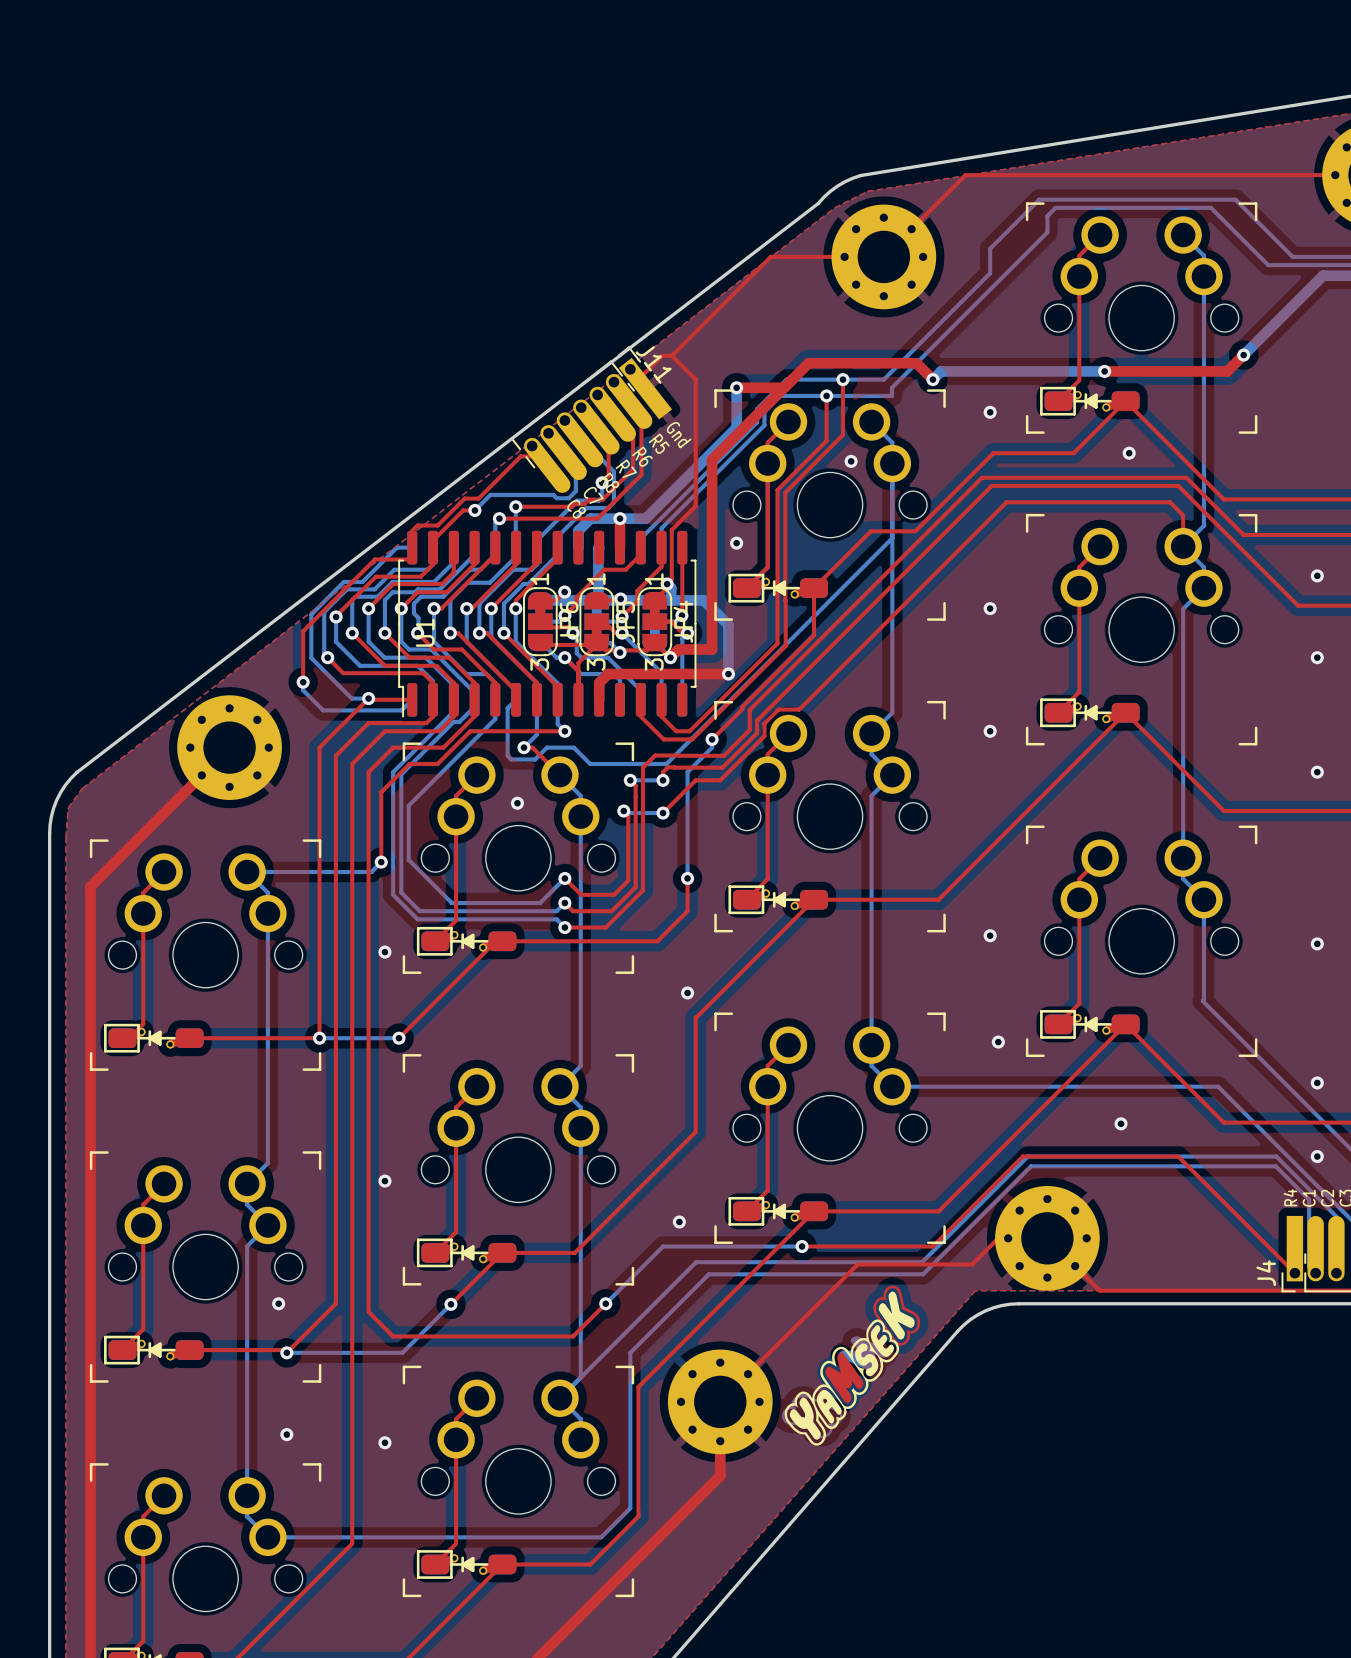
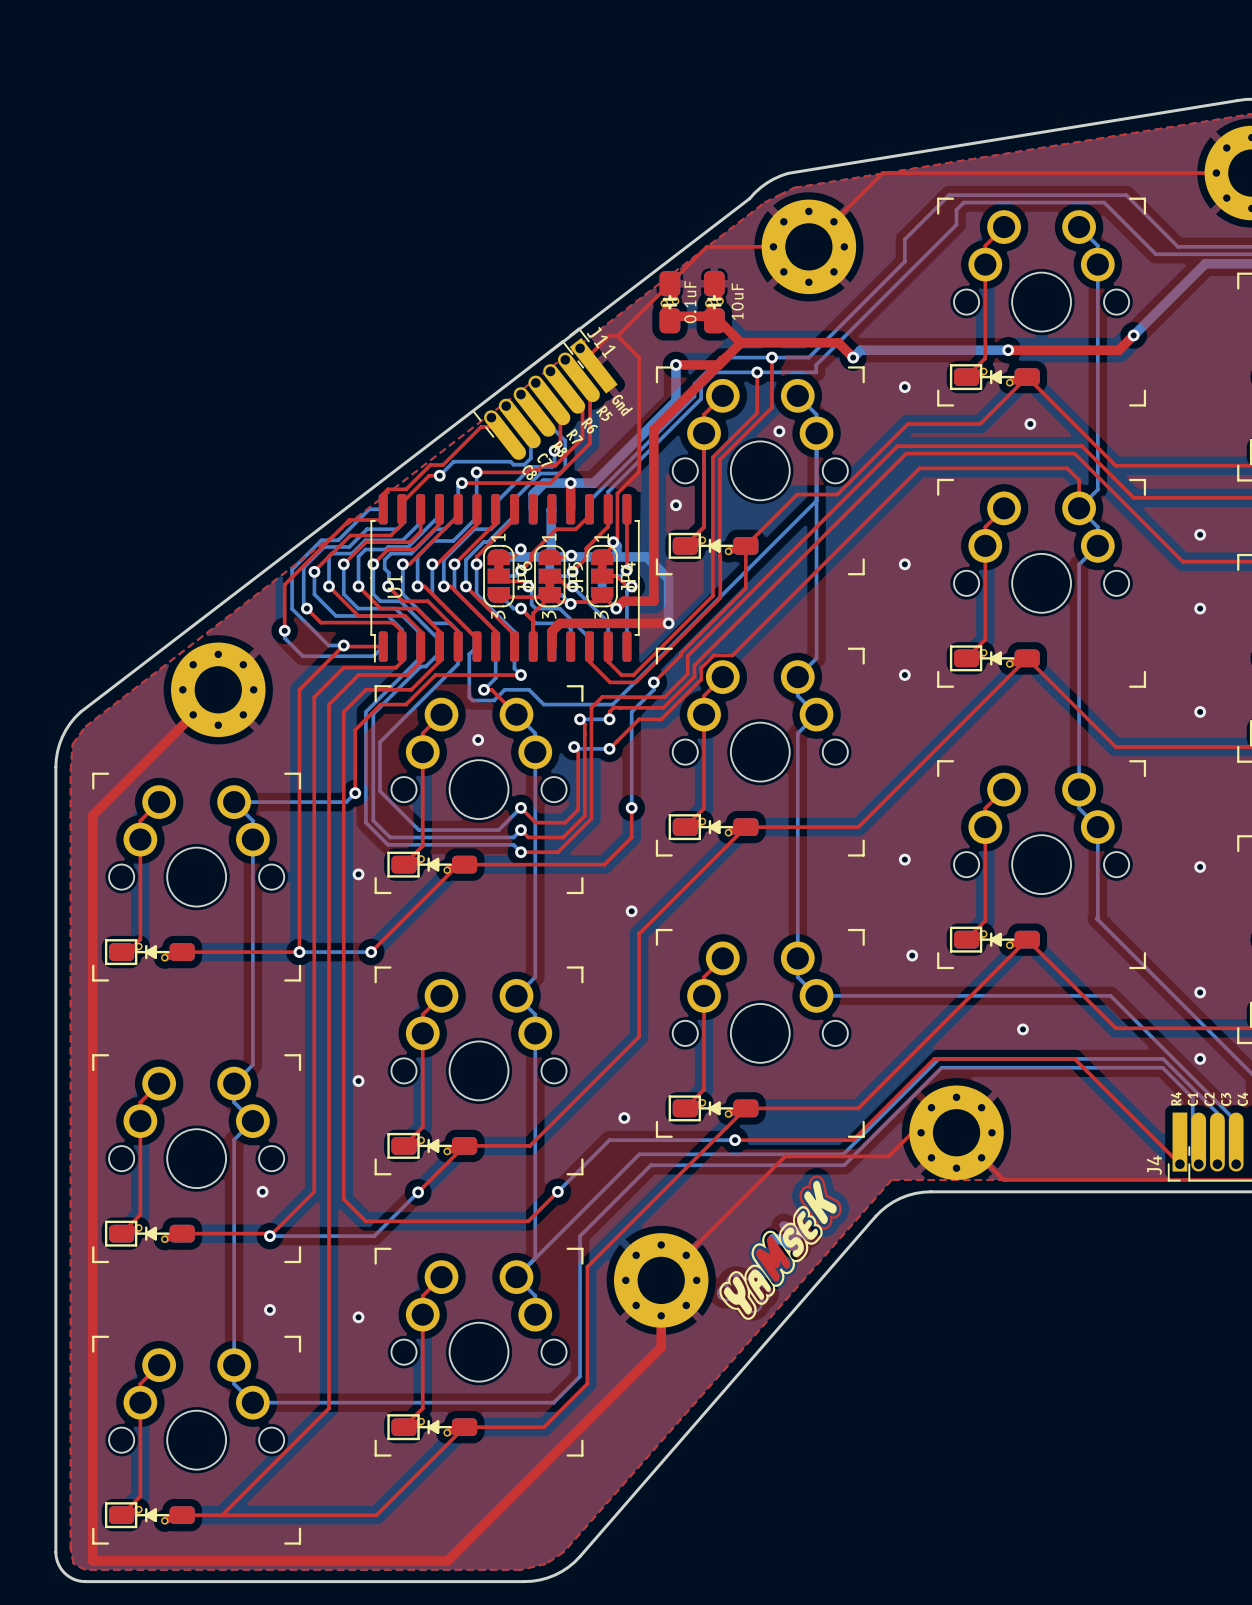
part: none -> 0.1uF (669, 302)
part: none -> 10uF (714, 302)
top track: none -> (669, 316) (714, 316) (740, 342)

